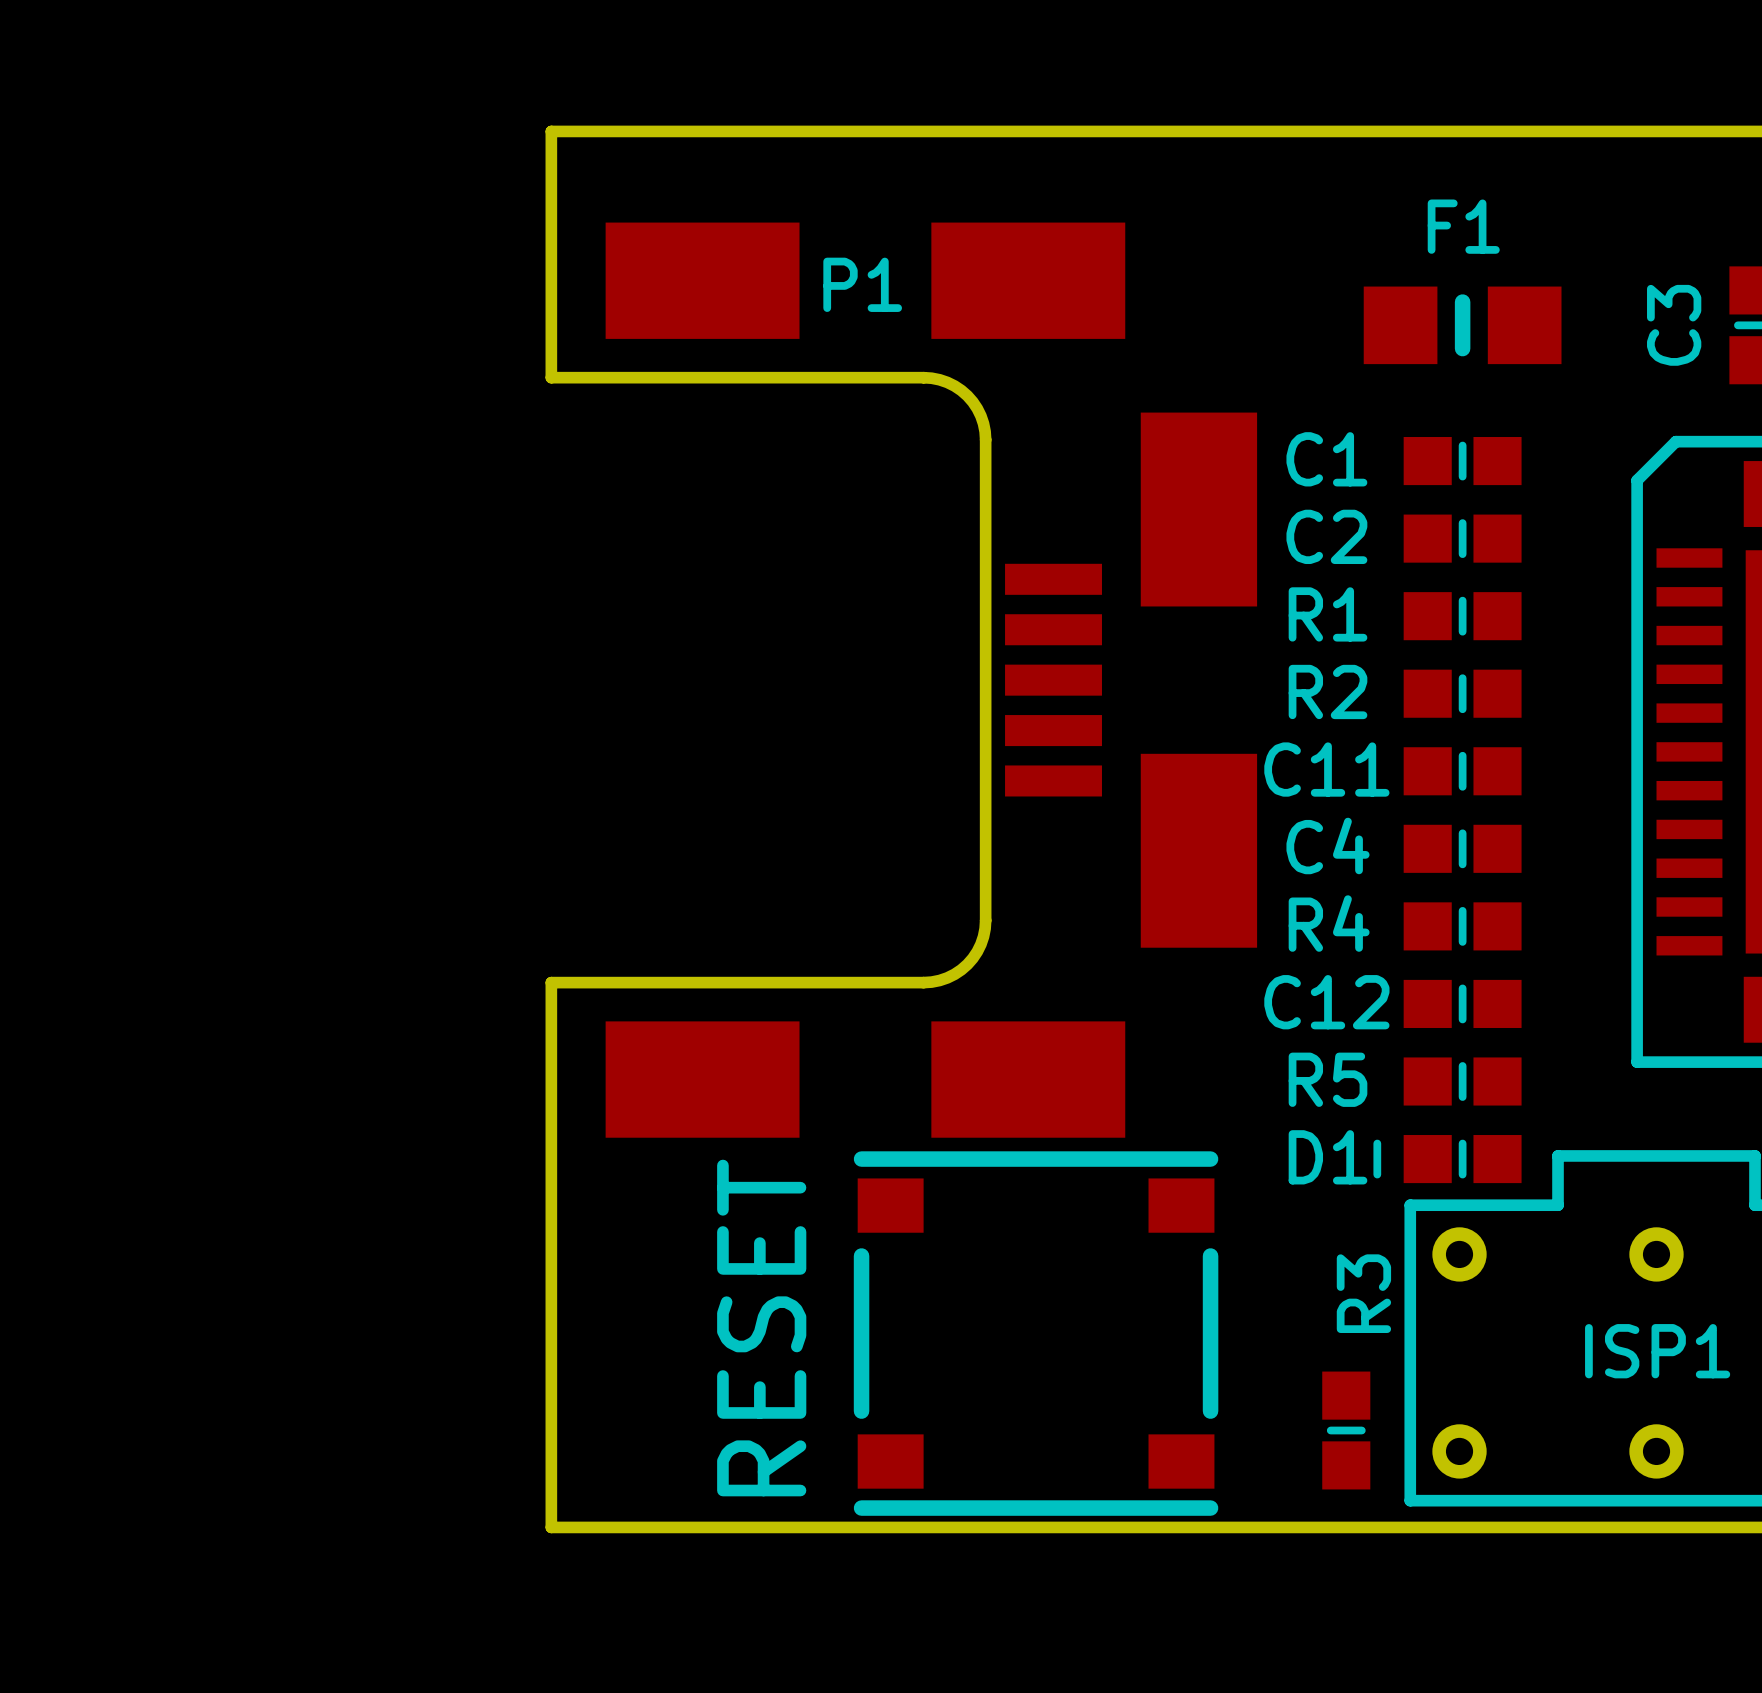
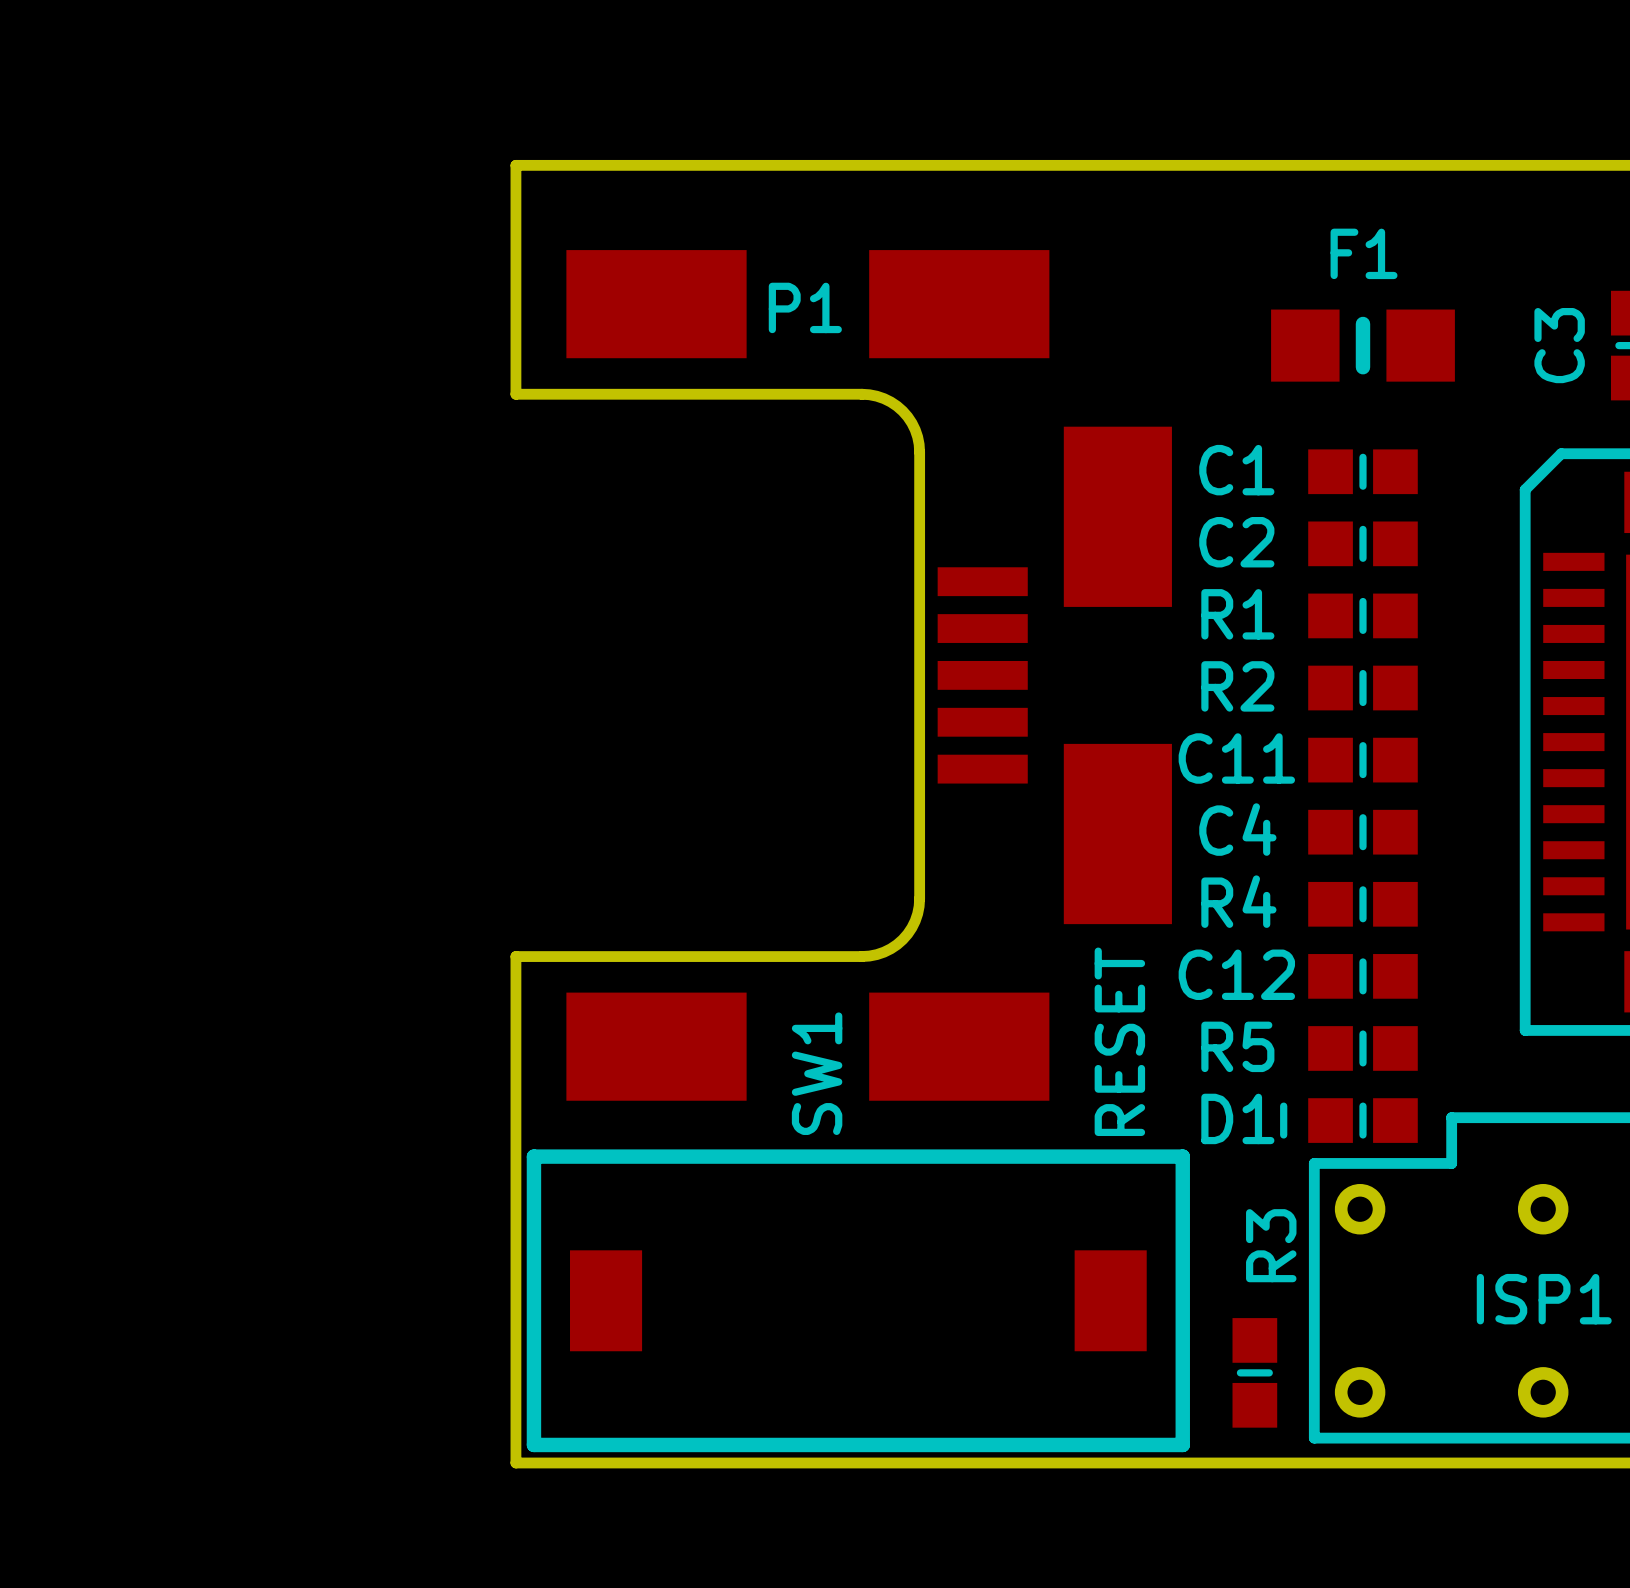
part: RESET (1036, 1333) -> none
SW1: none -> RESET (858, 1300)

